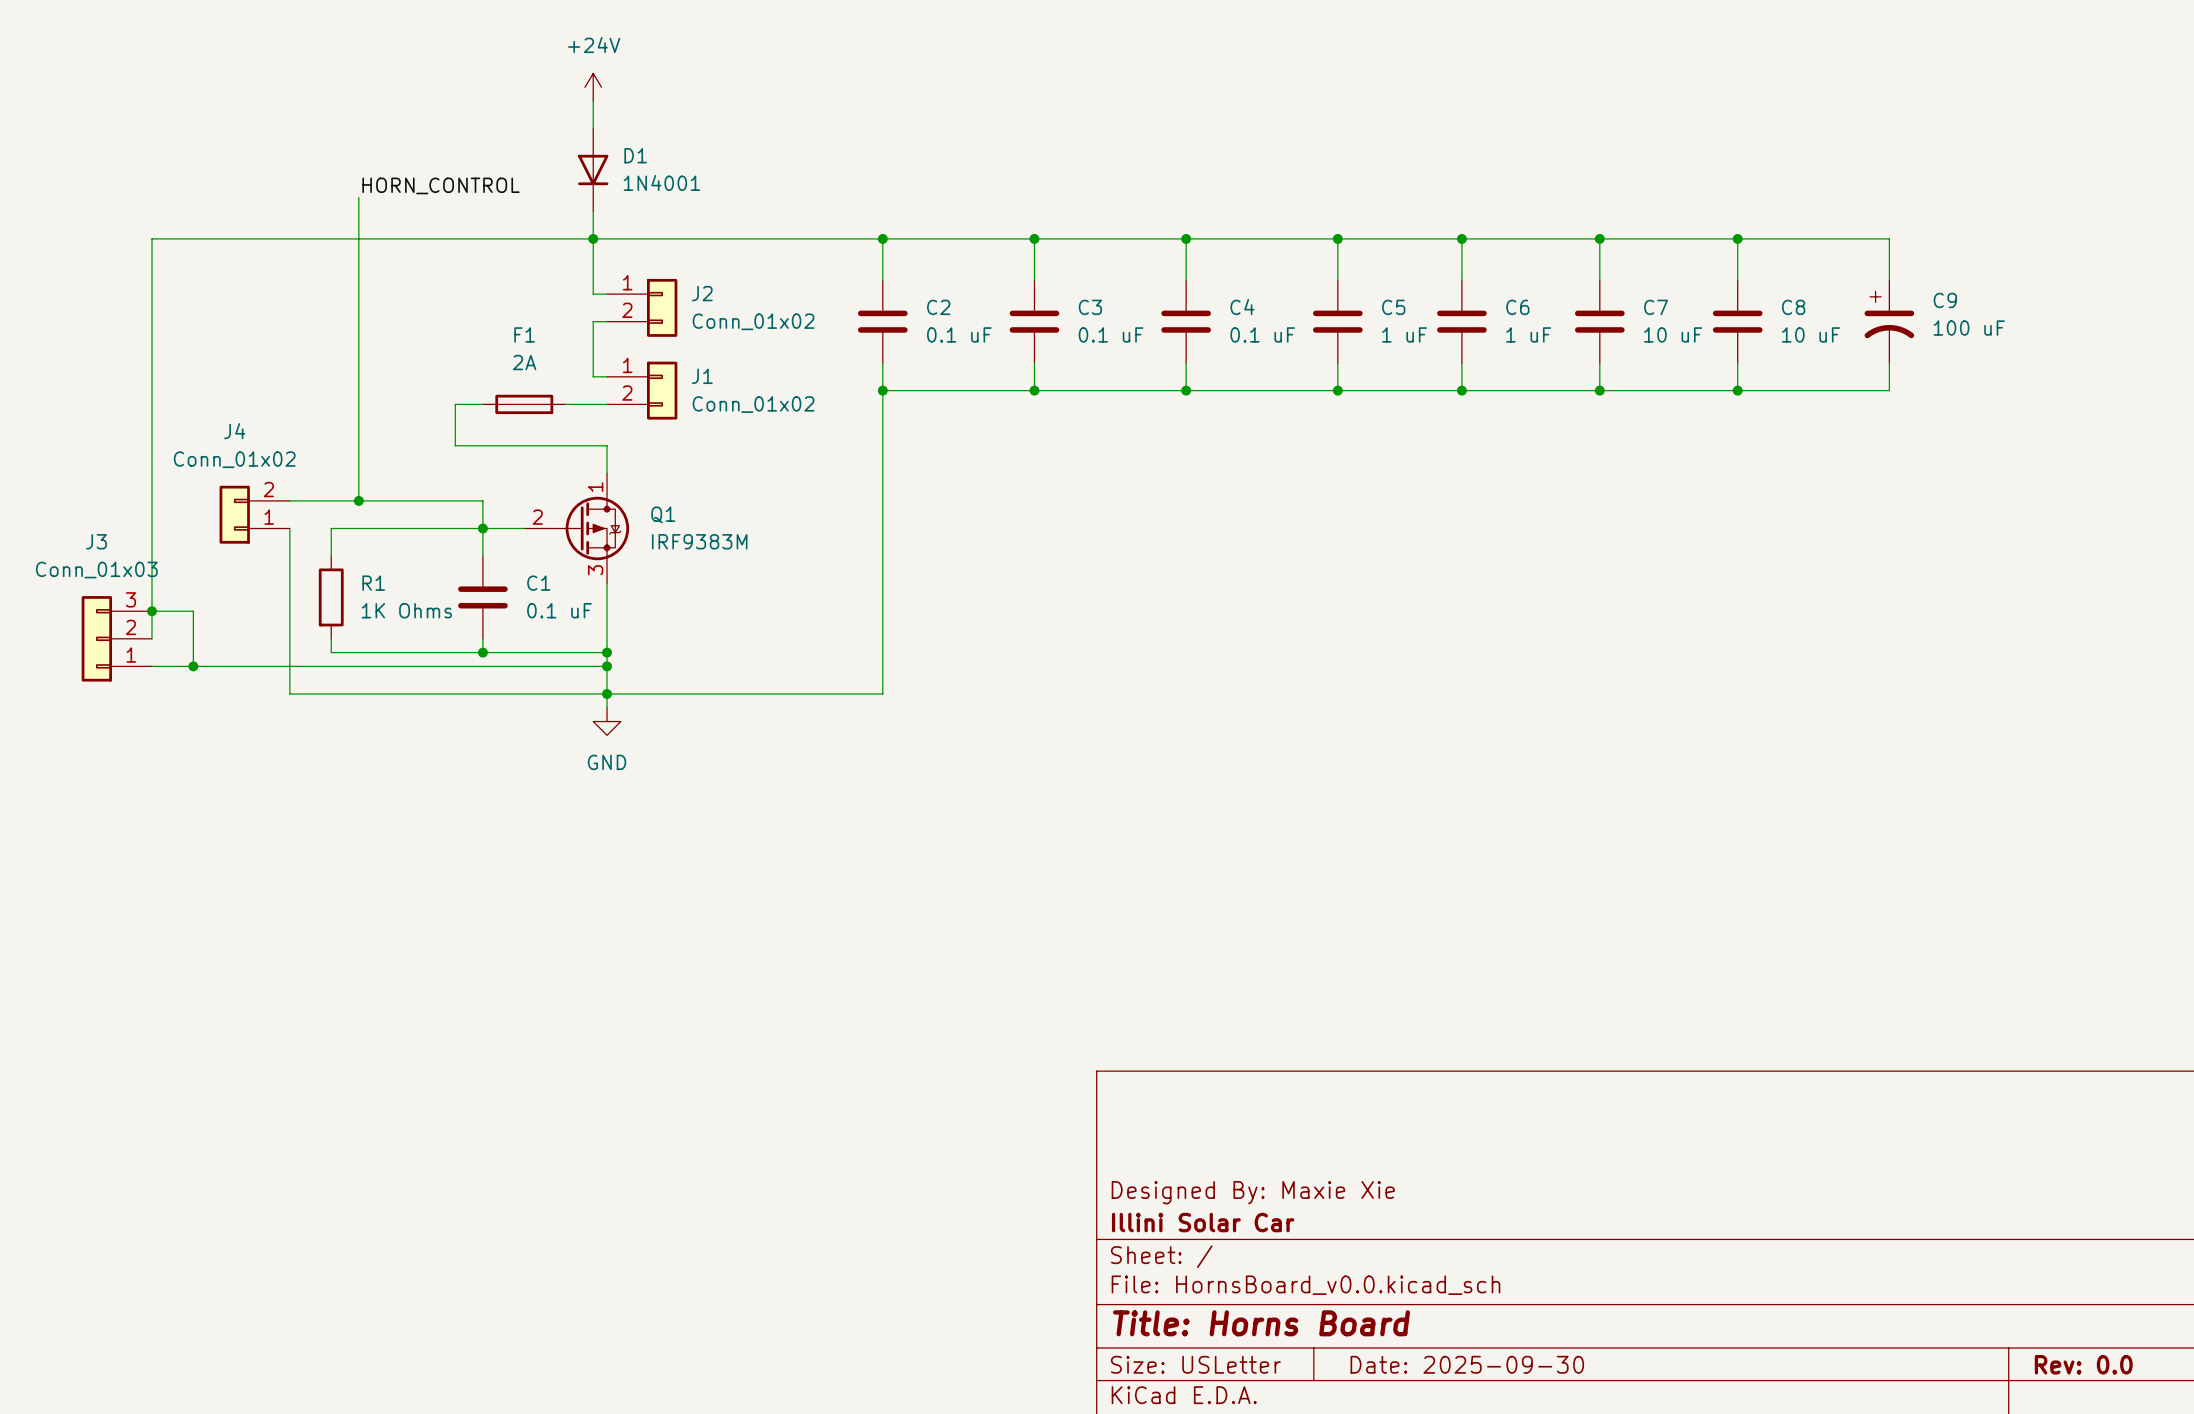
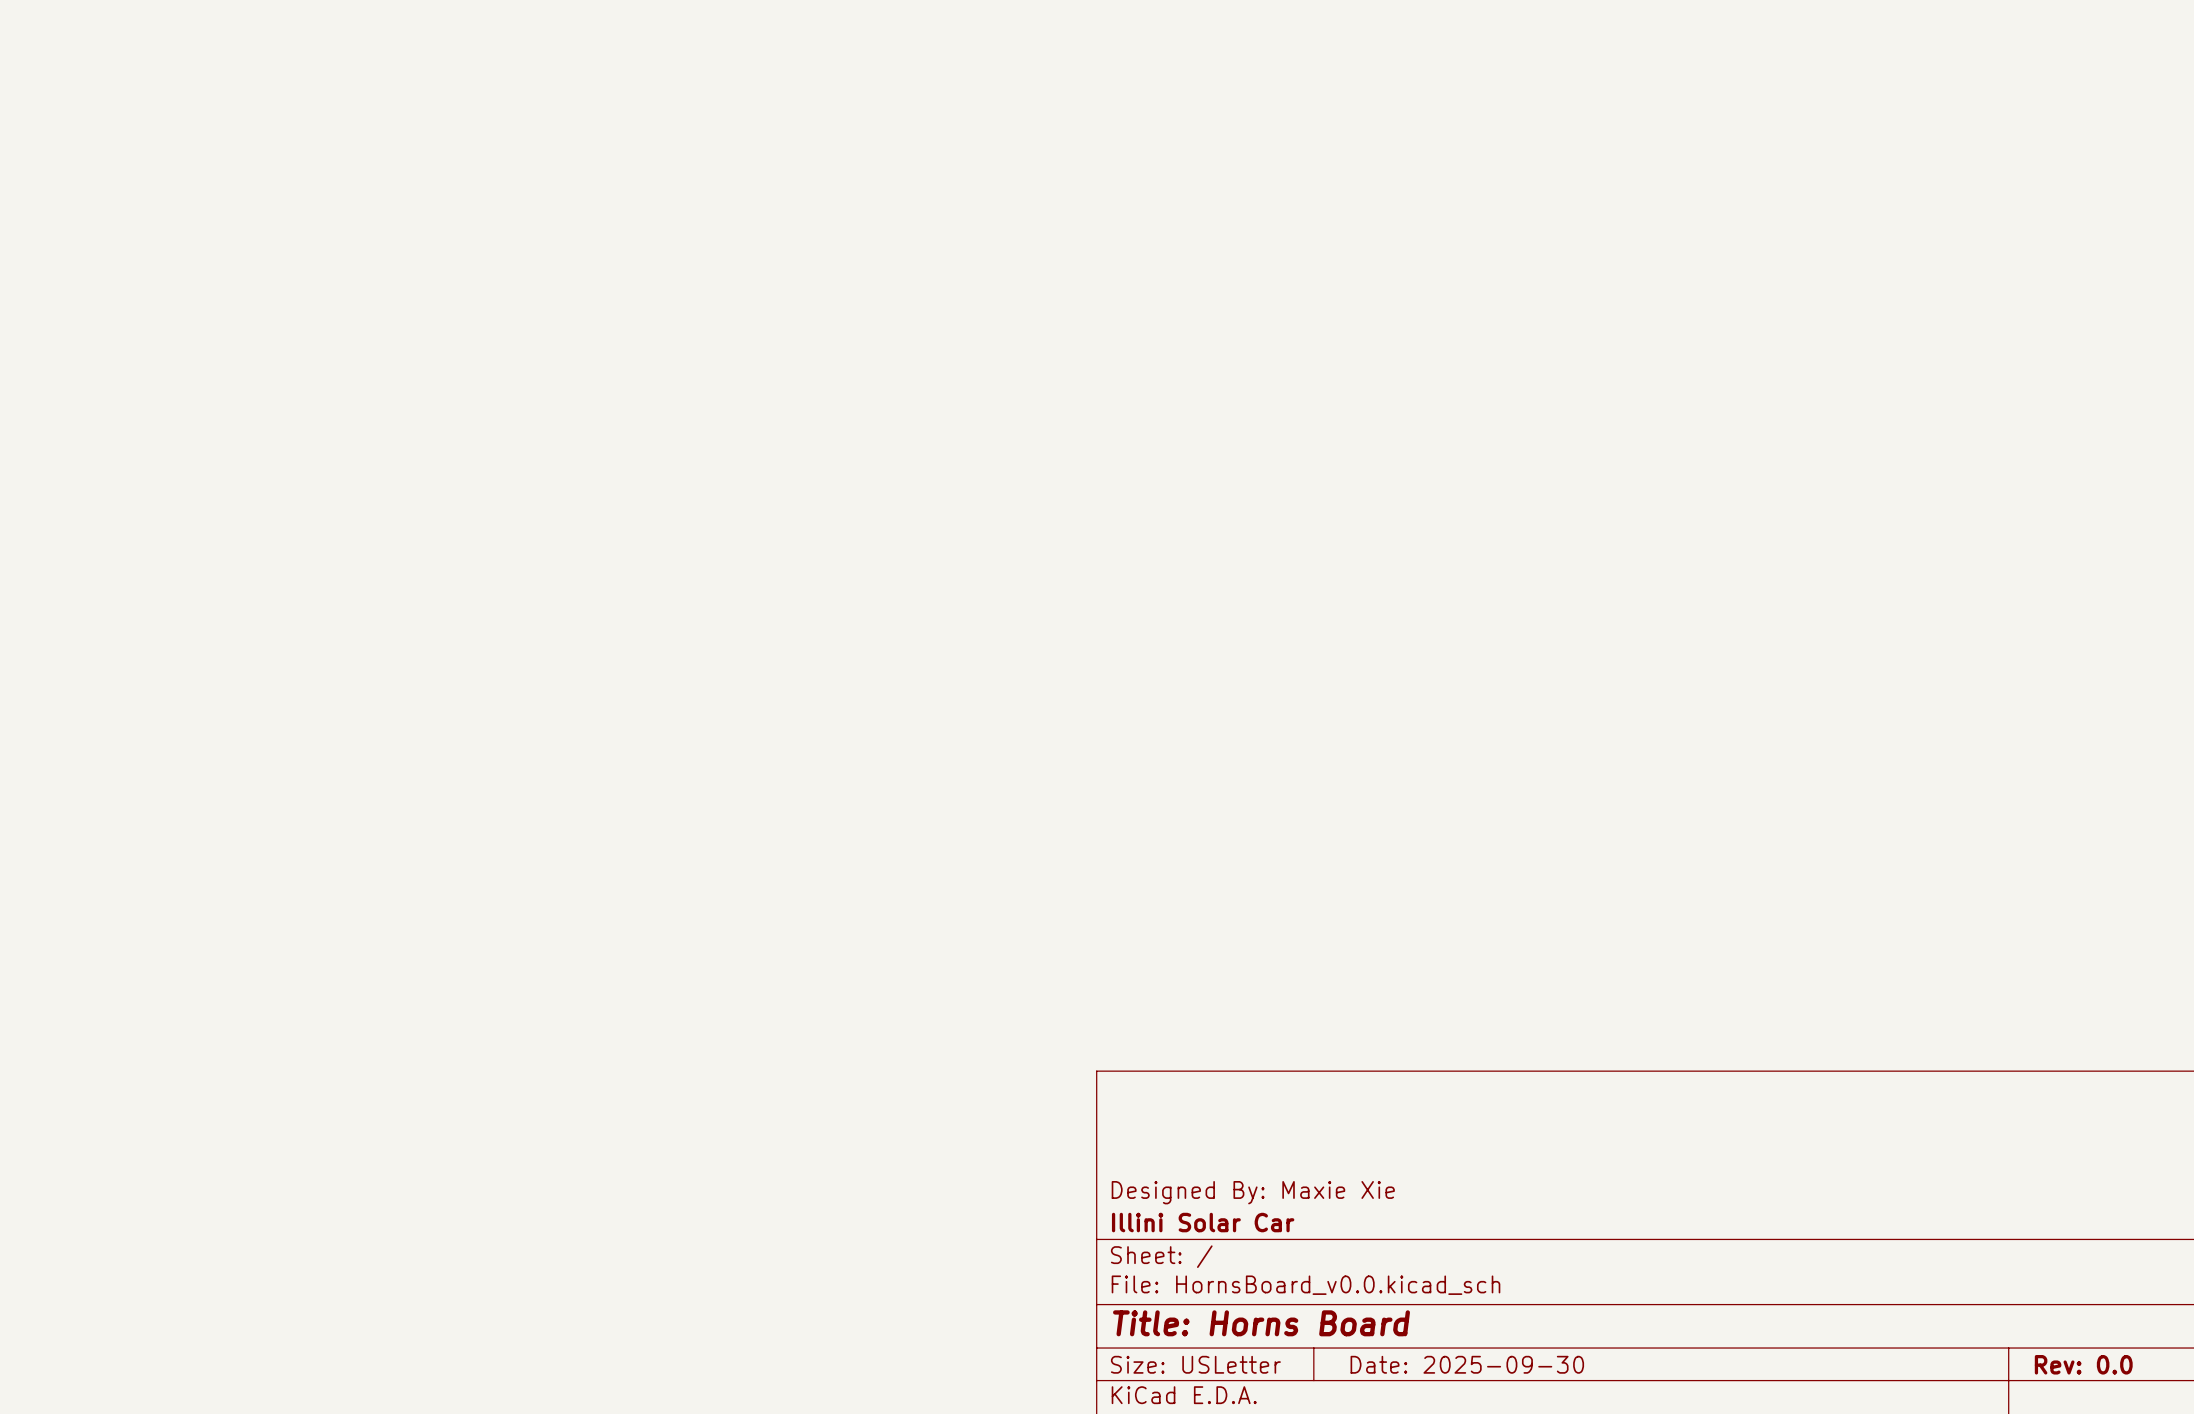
power symbol: +24V (593, 87) -> none
wire: (593, 101) (593, 128) -> none
D1: 1N4001 (593, 169) -> none
label: HORN_CONTROL (441, 185) -> none
wire: (358, 197) (358, 500) -> none
wire: (593, 211) (593, 294) (607, 294) -> none
junction: (593, 238) -> none
wire: (882, 238) (882, 280) -> none
junction: (882, 238) -> none
wire: (1034, 238) (1034, 280) -> none
junction: (1034, 238) -> none
wire: (1186, 238) (1186, 280) -> none
junction: (1186, 238) -> none
wire: (1337, 238) (1337, 280) -> none
junction: (1337, 238) -> none
wire: (1461, 238) (1461, 280) -> none
junction: (1461, 238) -> none
wire: (1599, 238) (1599, 280) -> none
junction: (1599, 238) -> none
wire: (1737, 238) (1737, 280) -> none
junction: (1737, 238) -> none
wire: (1889, 280) (1889, 238) (151, 238) (151, 638) -> none
J2: Conn_01x02 (642, 307) -> none
wire: (607, 321) (593, 321) (593, 376) (607, 376) -> none
C2: 0.1 uF (882, 321) -> none
C3: 0.1 uF (1034, 321) -> none
C4: 0.1 uF (1186, 321) -> none
C5: 1 uF (1337, 321) -> none
C6: 1 uF (1461, 321) -> none
C7: 10 uF (1599, 321) -> none
C8: 10 uF (1737, 321) -> none
C9: 100 uF (1889, 321) -> none
wire: (882, 363) (882, 693) (289, 693) (289, 528) -> none
wire: (1034, 363) (1034, 390) -> none
wire: (1186, 363) (1186, 390) -> none
wire: (1337, 363) (1337, 390) -> none
wire: (1461, 363) (1461, 390) -> none
wire: (1599, 363) (1599, 390) -> none
wire: (1737, 363) (1737, 390) -> none
wire: (1889, 363) (1889, 390) (882, 390) -> none
J1: Conn_01x02 (642, 390) -> none
junction: (882, 390) -> none
junction: (1034, 390) -> none
junction: (1186, 390) -> none
junction: (1337, 390) -> none
junction: (1461, 390) -> none
junction: (1599, 390) -> none
junction: (1737, 390) -> none
wire: (482, 404) (455, 404) (455, 445) (607, 445) (607, 473) -> none
F1: 2A (524, 404) -> none
wire: (565, 404) (607, 404) -> none
wire: (289, 500) (482, 500) (482, 556) -> none
junction: (358, 500) -> none
J4: Conn_01x02 (254, 514) -> none
junction: (482, 528) -> none
wire: (524, 528) (331, 528) (331, 556) -> none
Q1: IRF9383M (576, 528) -> none
wire: (607, 583) (607, 707) -> none
R1: 1K Ohms (331, 597) -> none
C1: 0.1 uF (482, 597) -> none
wire: (151, 611) (193, 611) (193, 666) -> none
junction: (151, 611) -> none
J3: Conn_01x03 (116, 638) -> none
wire: (331, 638) (331, 652) (607, 652) -> none
wire: (482, 638) (482, 652) -> none
junction: (482, 652) -> none
junction: (607, 652) -> none
wire: (151, 666) (607, 666) -> none
junction: (193, 666) -> none
junction: (607, 666) -> none
junction: (607, 693) -> none
power symbol: GND (607, 721) -> none

